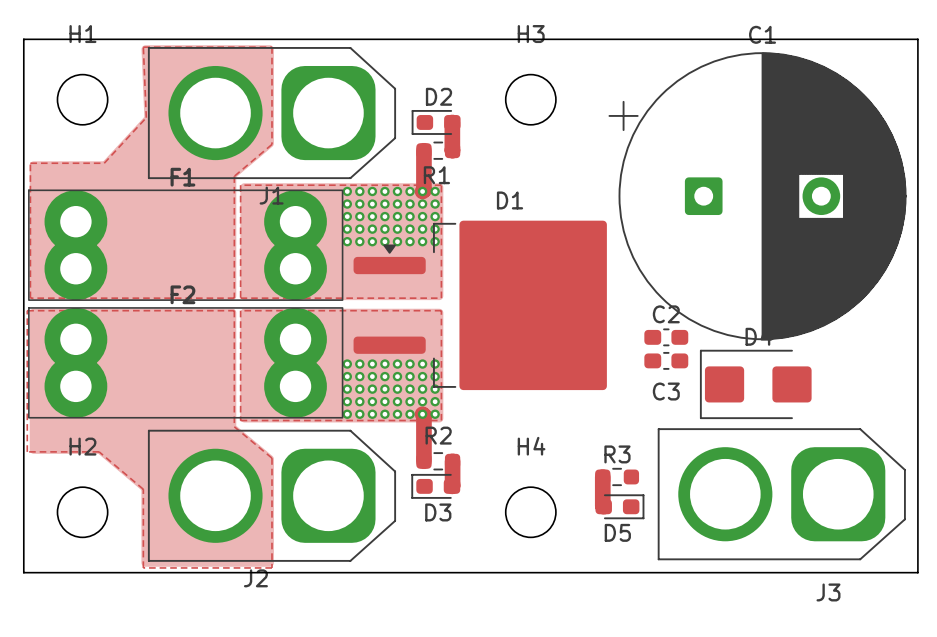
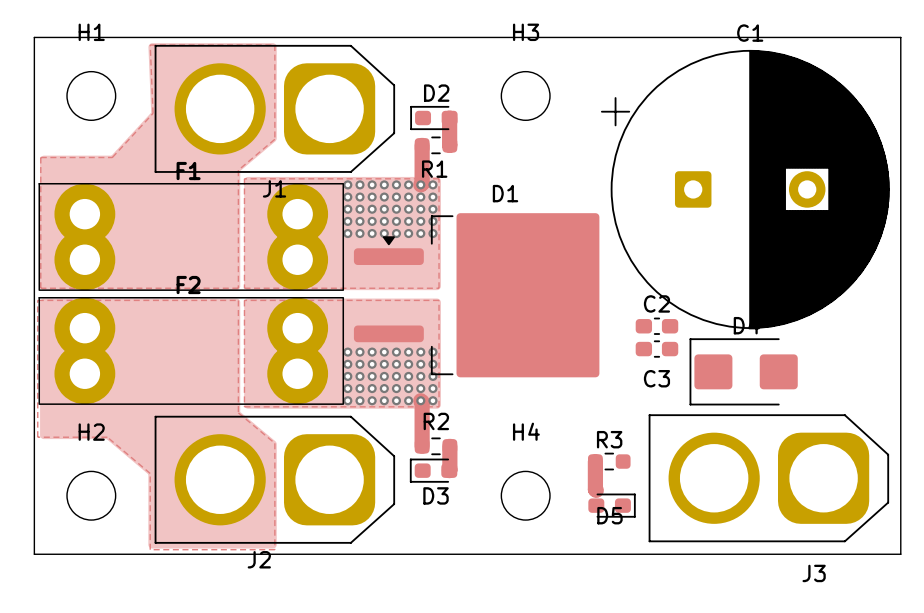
D5 position: (619, 506) -> (612, 505)

